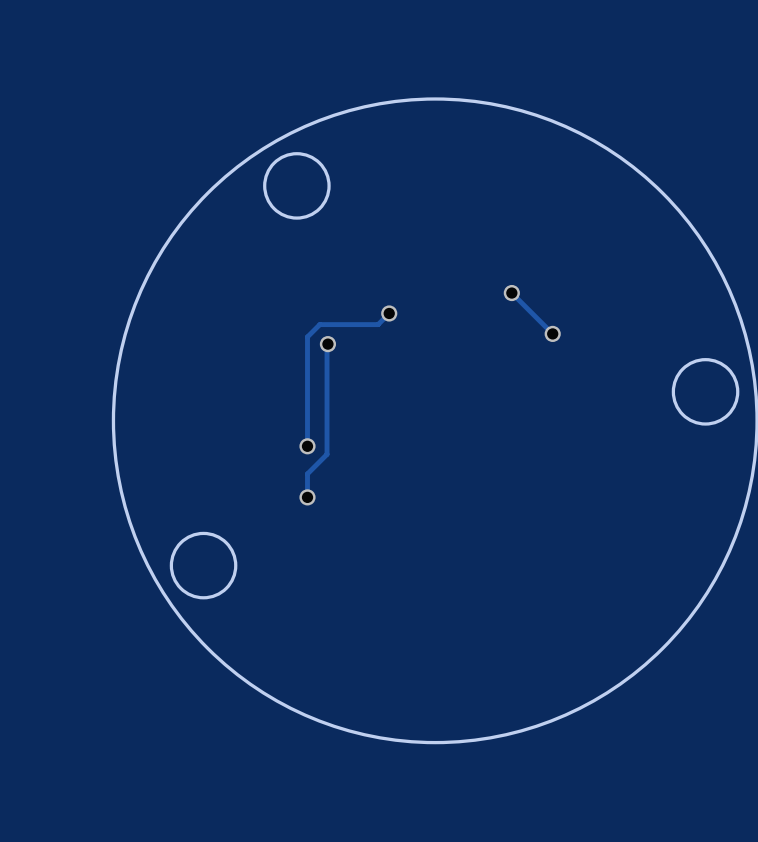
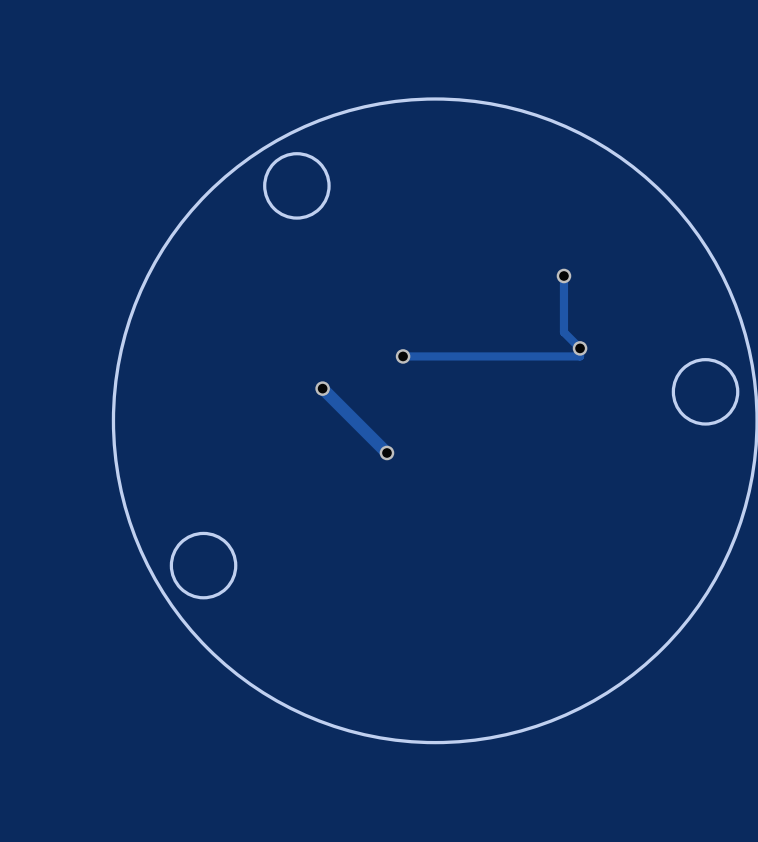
track: none -> (563, 275) (563, 332) (580, 348) (580, 356) (403, 356)
via: none -> (563, 275)
track: (511, 293) (552, 333) -> none
via: (511, 293) -> none
track: (389, 313) (378, 324) (319, 324) (307, 336) (307, 446) -> none
via: (389, 313) -> none
via: (552, 333) -> none
track: (327, 344) (327, 454) (307, 473) (307, 497) -> none
via: (327, 344) -> none
via: none -> (580, 348)
via: none -> (403, 356)
track: none -> (322, 388) (386, 452)
via: none -> (322, 388)
via: (307, 446) -> none
via: none -> (386, 452)
via: (307, 497) -> none

